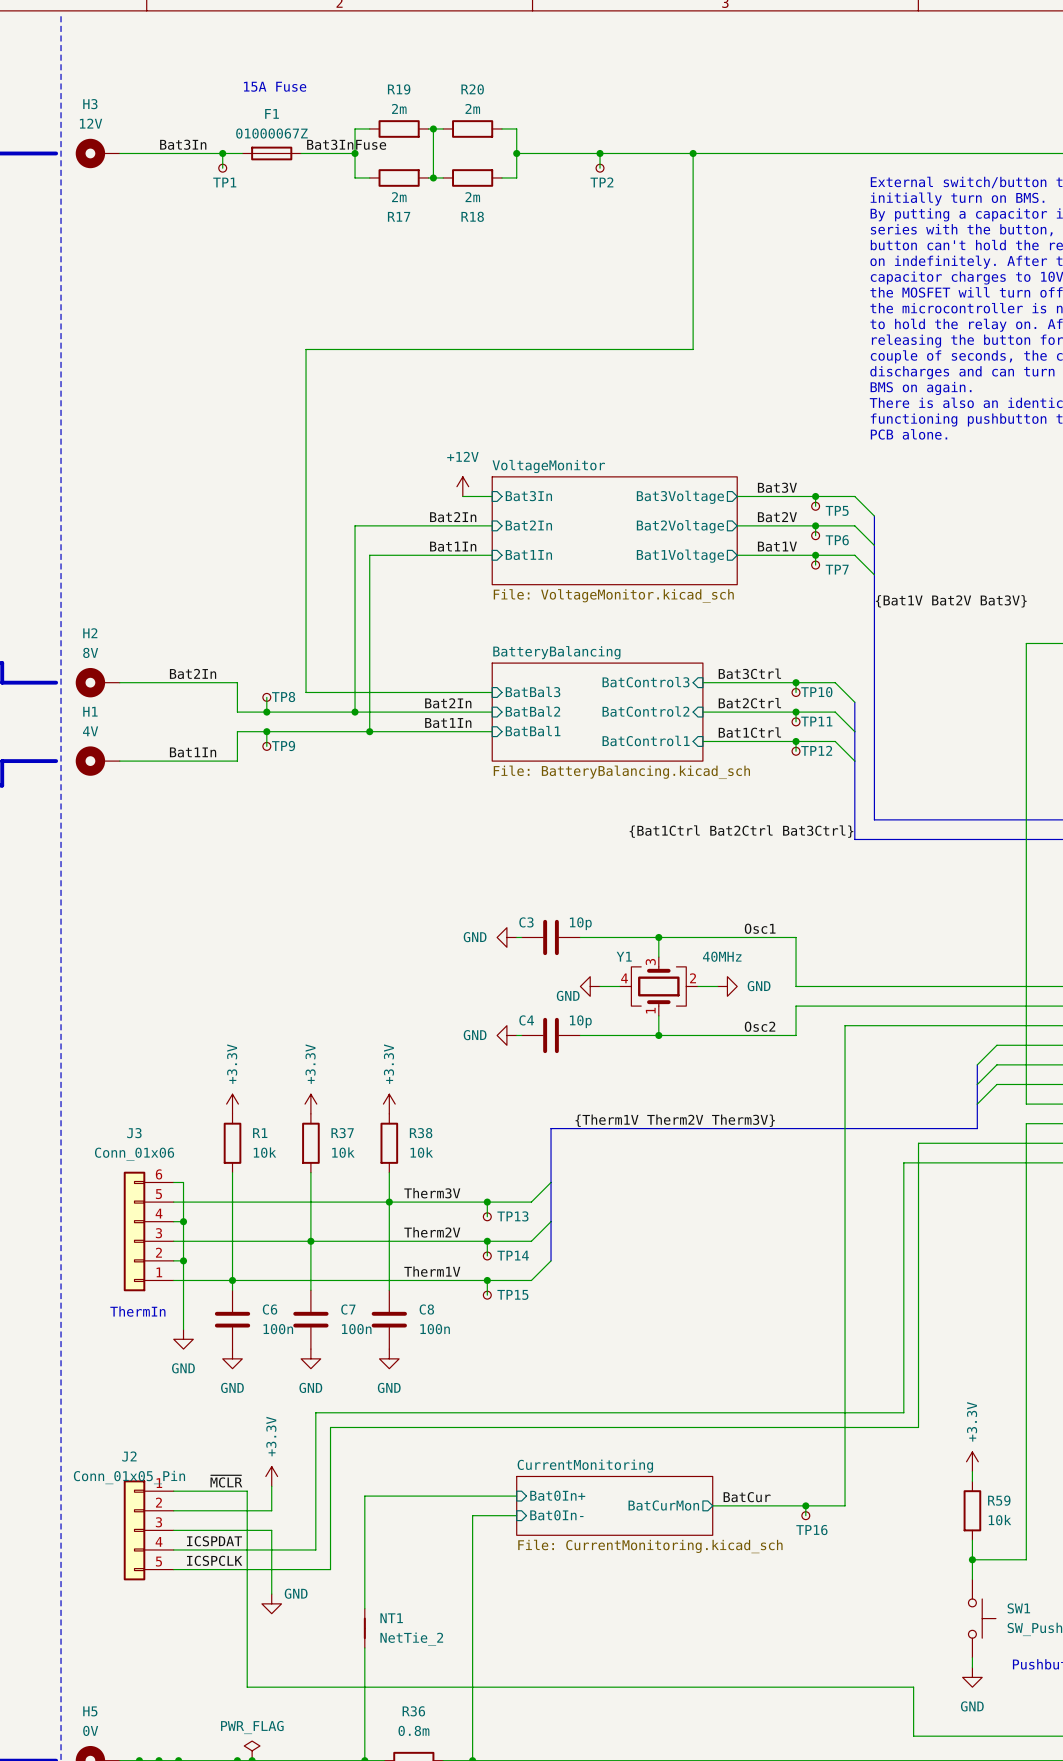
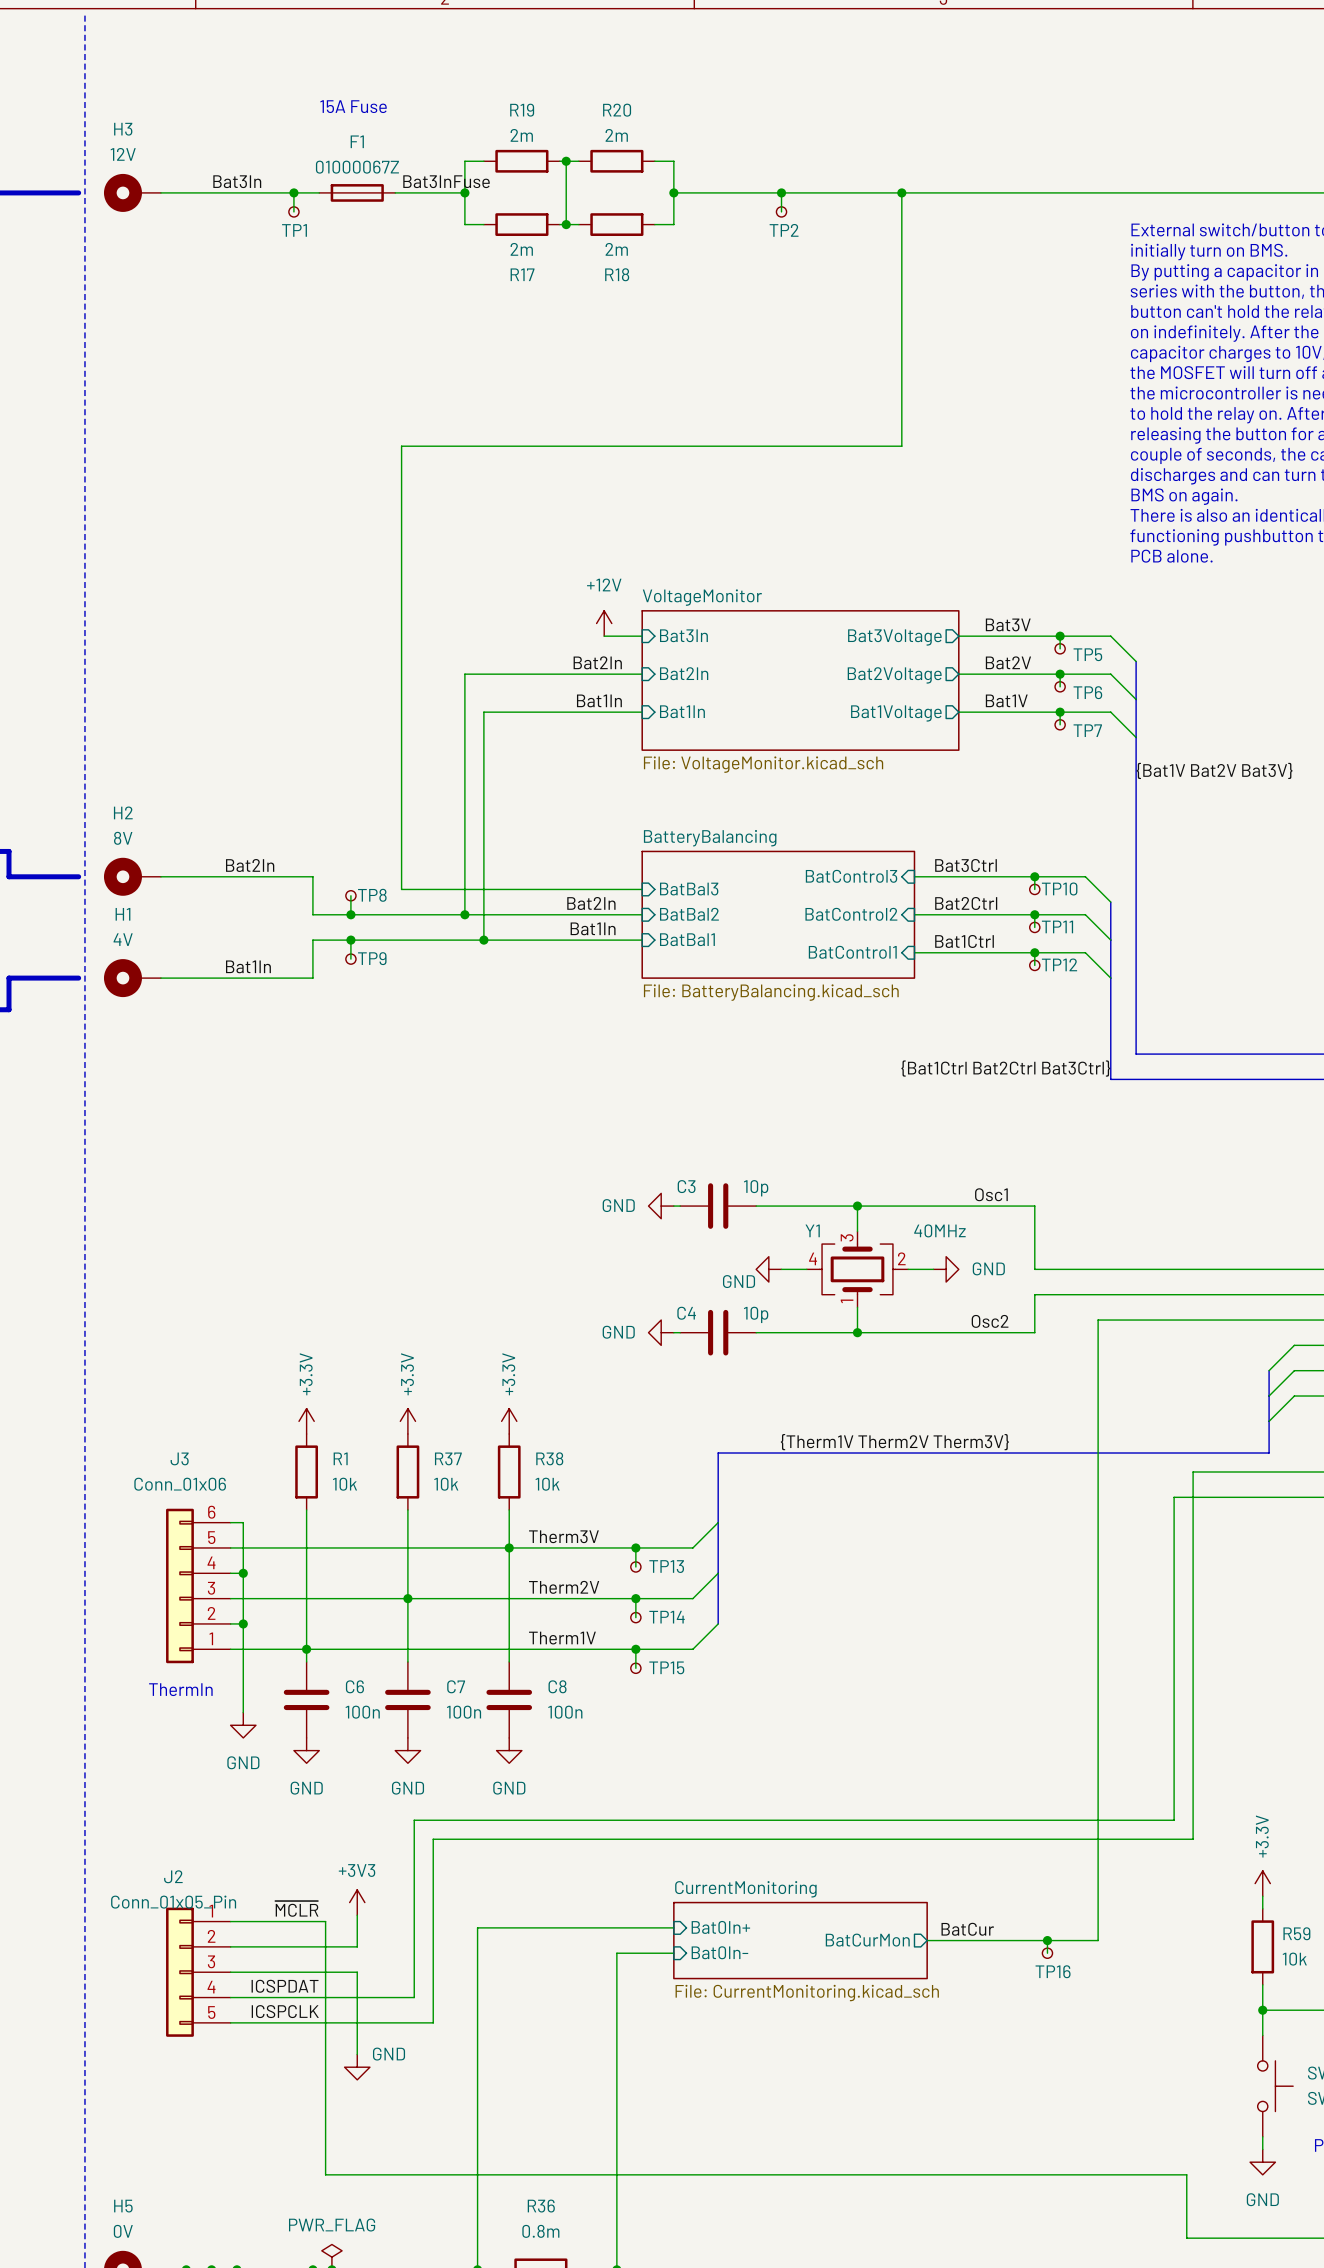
power symbol: +3.3V (271, 1476) -> +3V3 (357, 1902)
NT1: NetTie_2 (364, 1628) -> none

